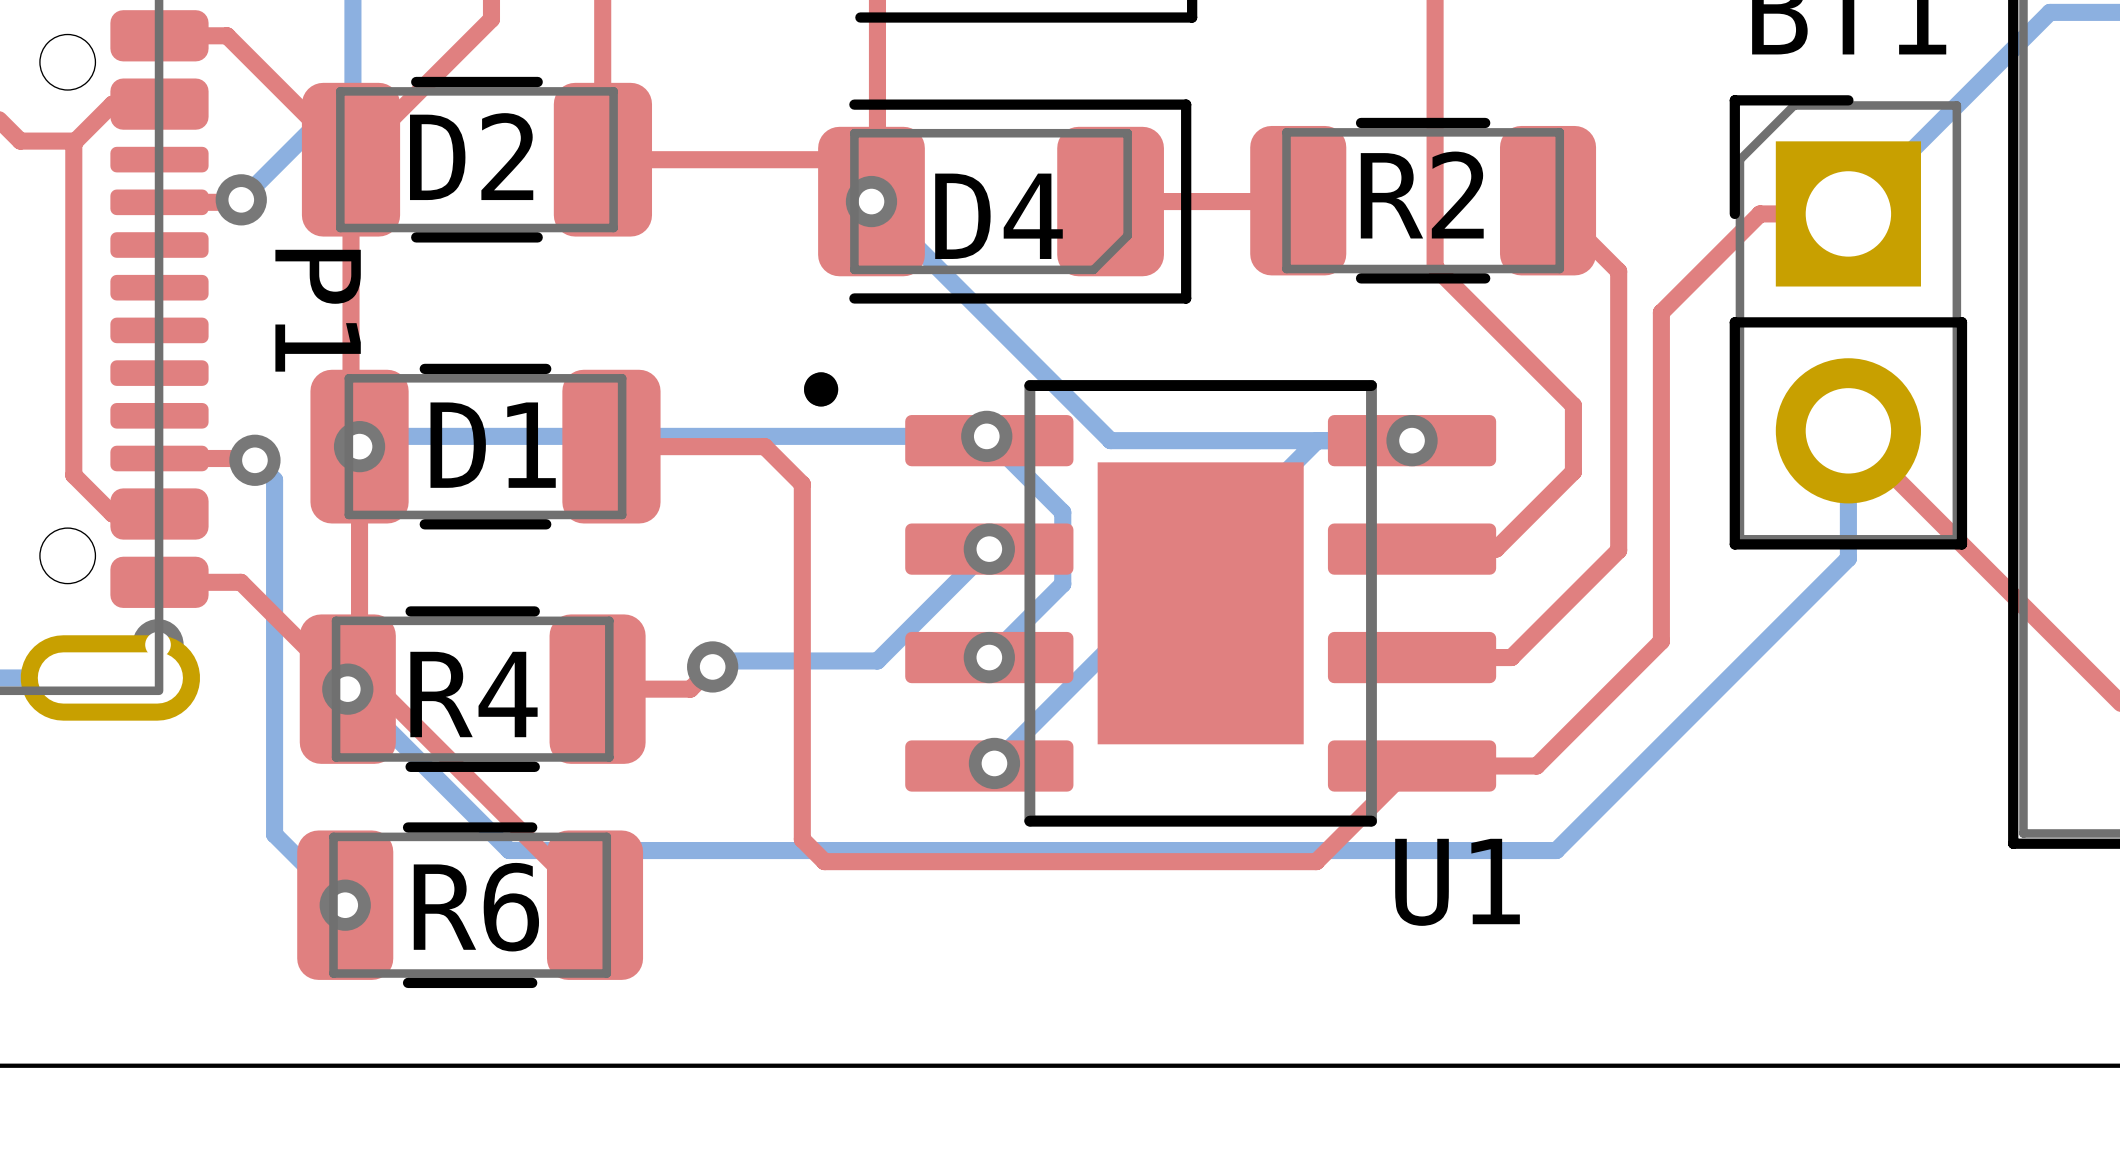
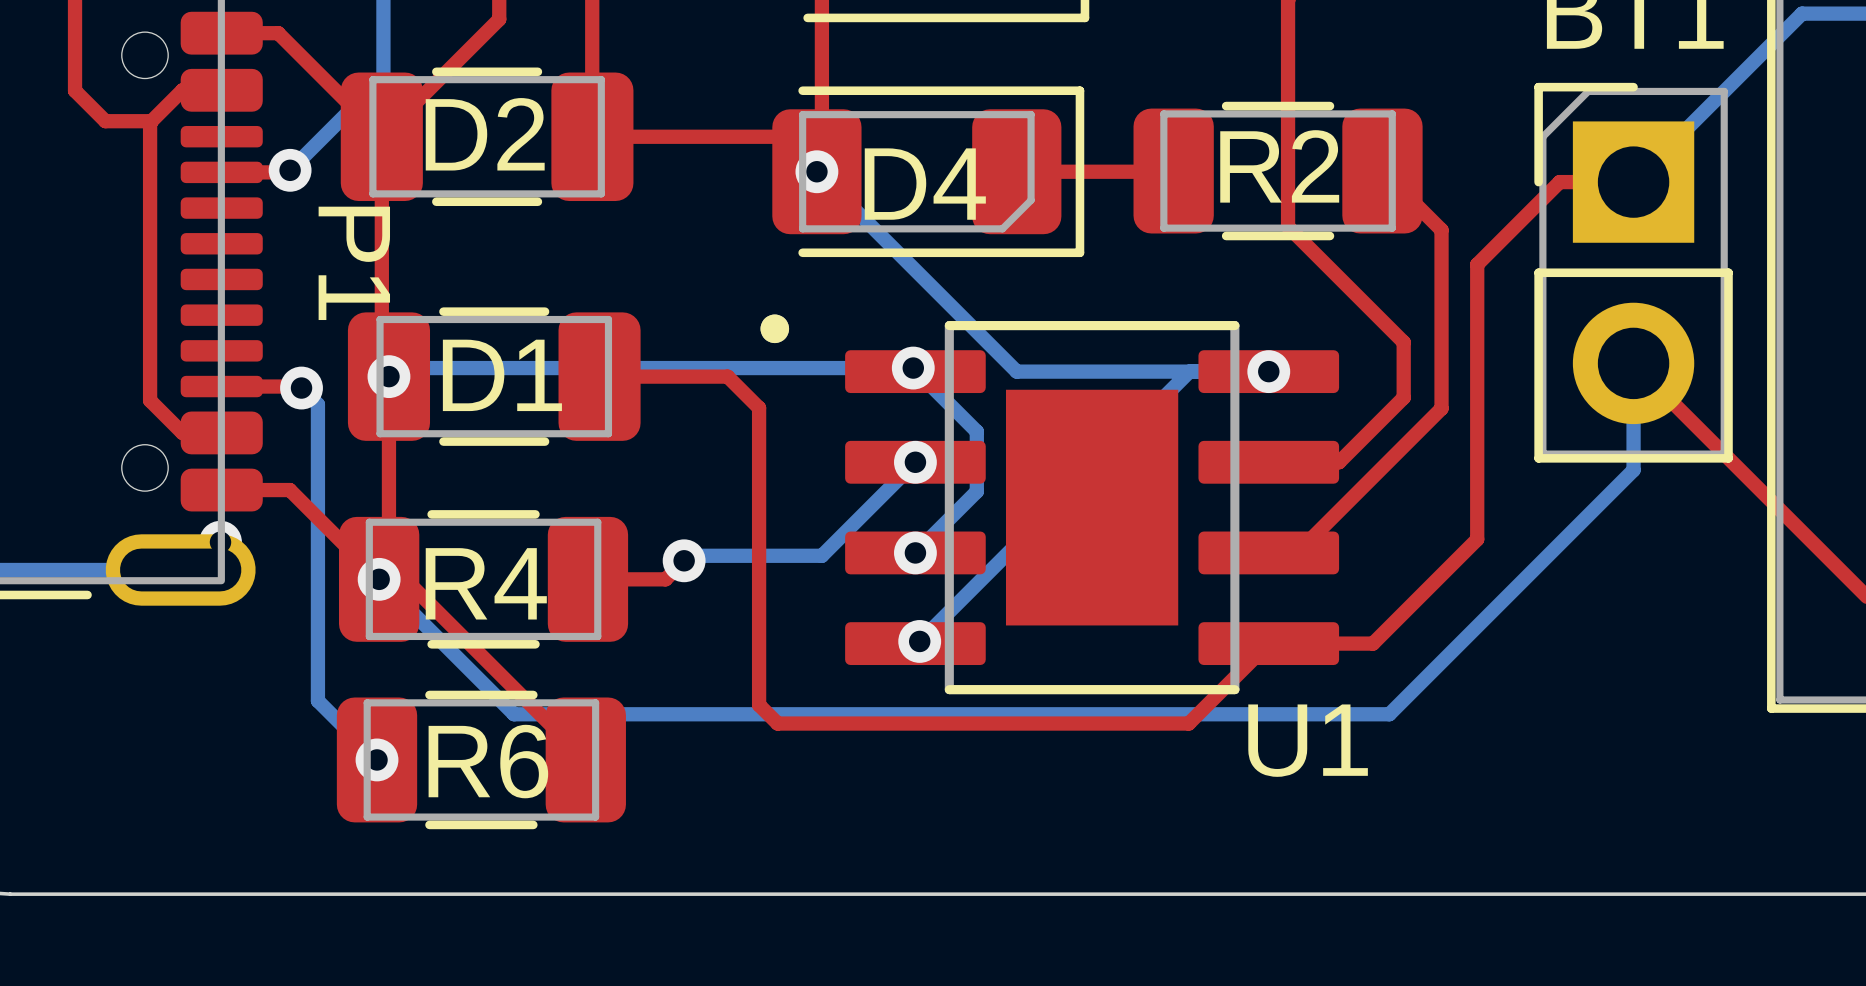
top track: (1618, 484) (1618, 550) (1511, 657) (1445, 657) -> (1441, 408) (1297, 552)

